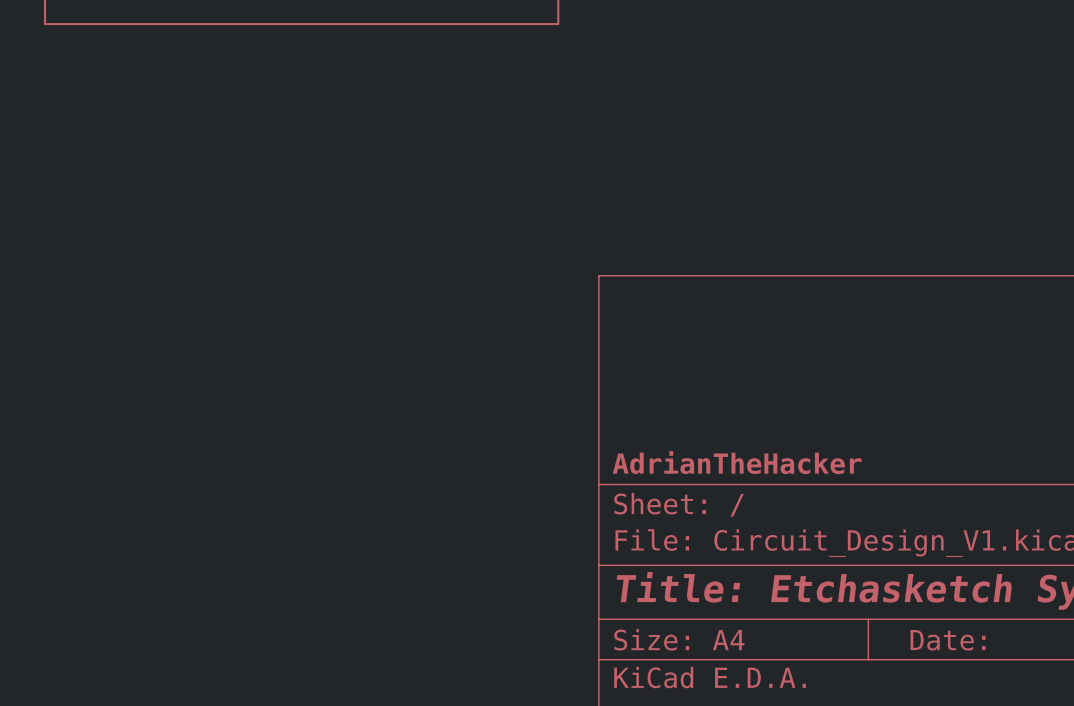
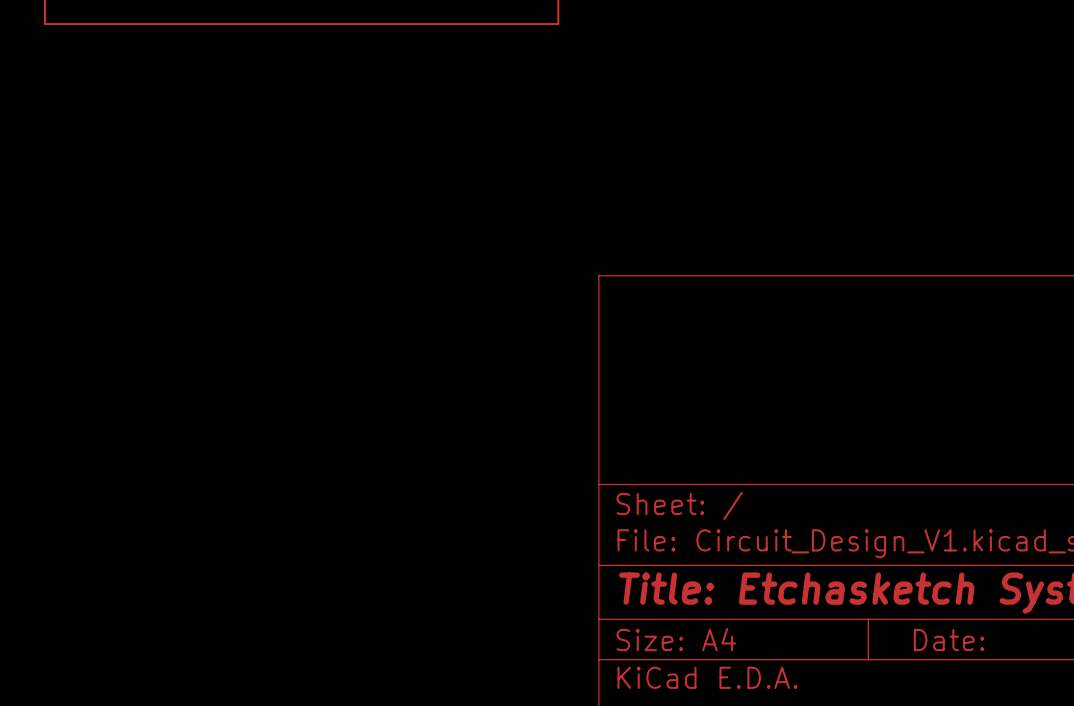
title block: AdrianTheHacker (737, 462) -> none

